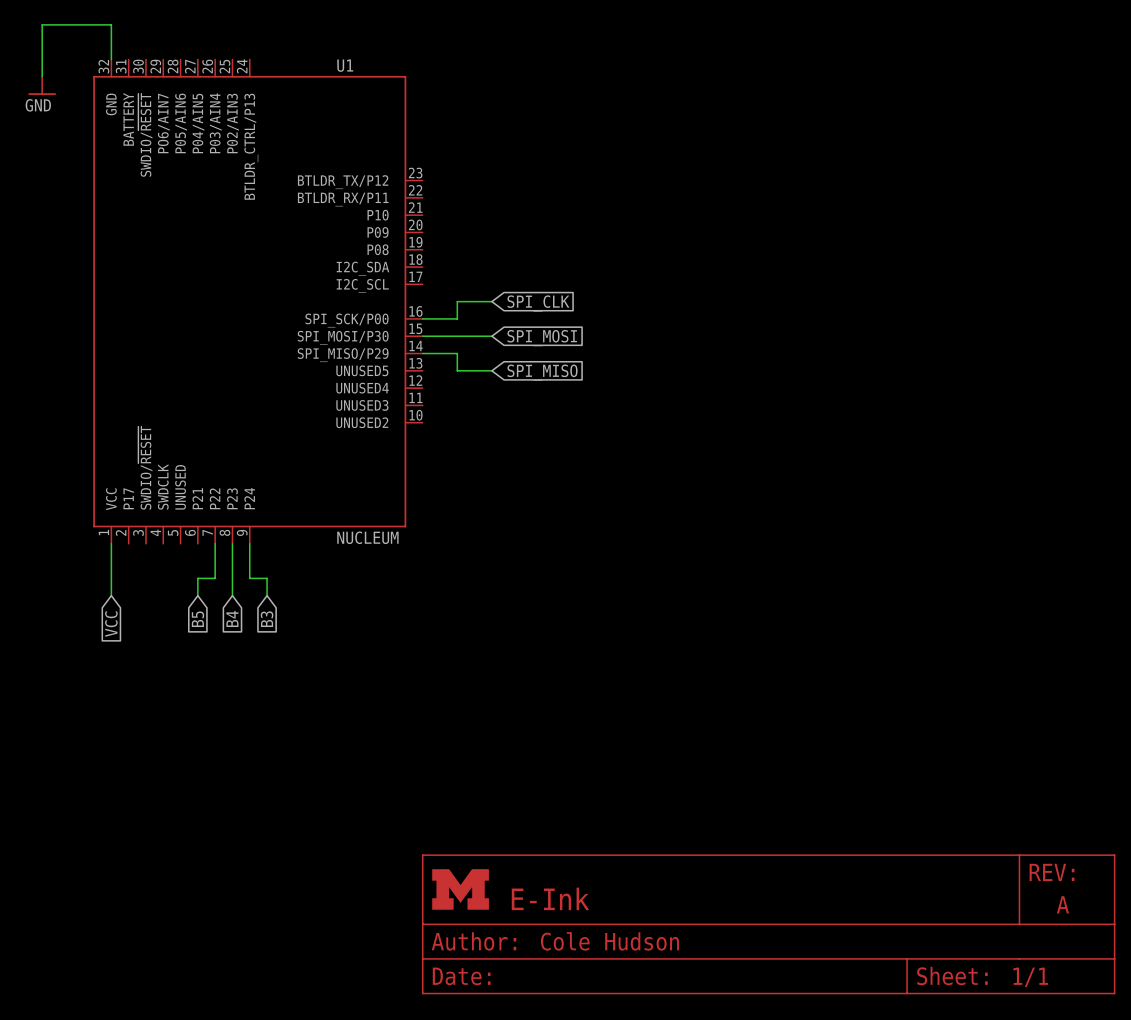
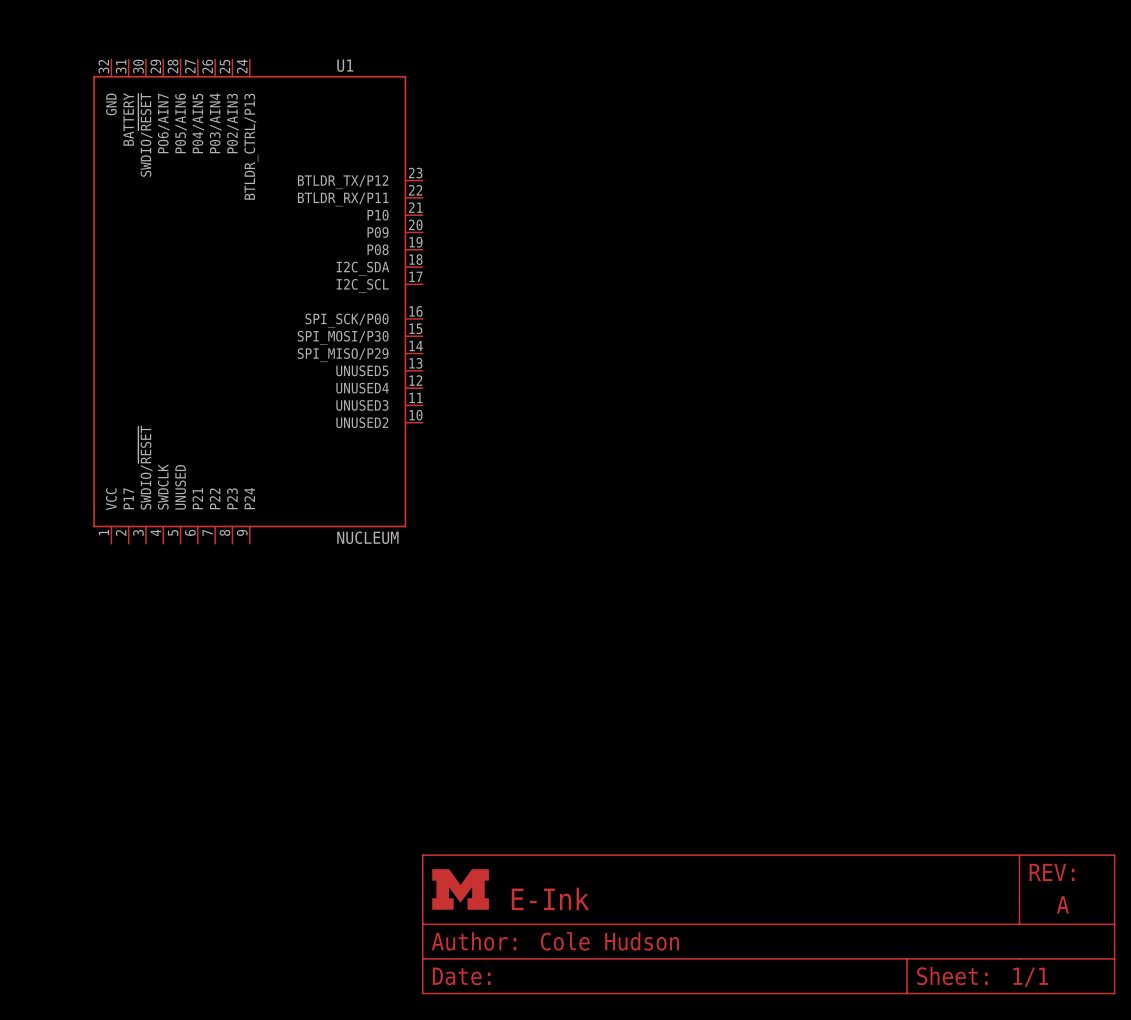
wire: (111, 59) (111, 24) (42, 24) (42, 76) -> none
power symbol: GND (42, 85) -> none
wire: (491, 301) (457, 301) (457, 318) (422, 318) -> none
global label: SPI_CLK (538, 303) -> none
wire: (422, 336) (491, 336) -> none
global label: SPI_MOSI (542, 338) -> none
wire: (422, 353) (457, 353) (457, 370) (491, 370) -> none
global label: SPI_MISO (542, 372) -> none
wire: (111, 543) (111, 595) -> none
wire: (215, 543) (215, 578) (197, 578) (197, 595) -> none
wire: (232, 543) (232, 595) -> none
wire: (249, 543) (249, 578) (267, 578) (267, 595) -> none
global label: B4 (232, 618) -> none
global label: B5 (197, 619) -> none
global label: B3 (267, 619) -> none
global label: VCC (111, 624) -> none

